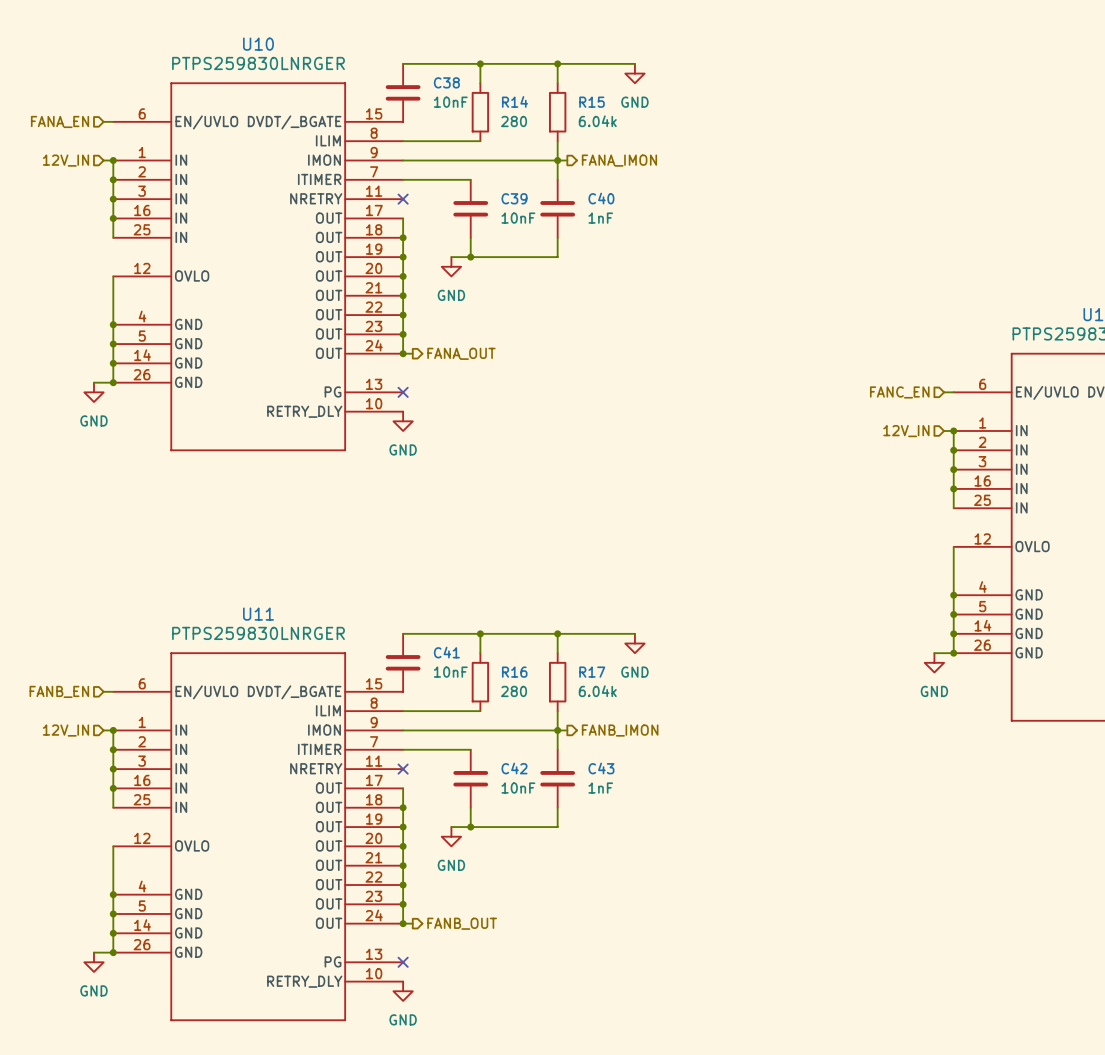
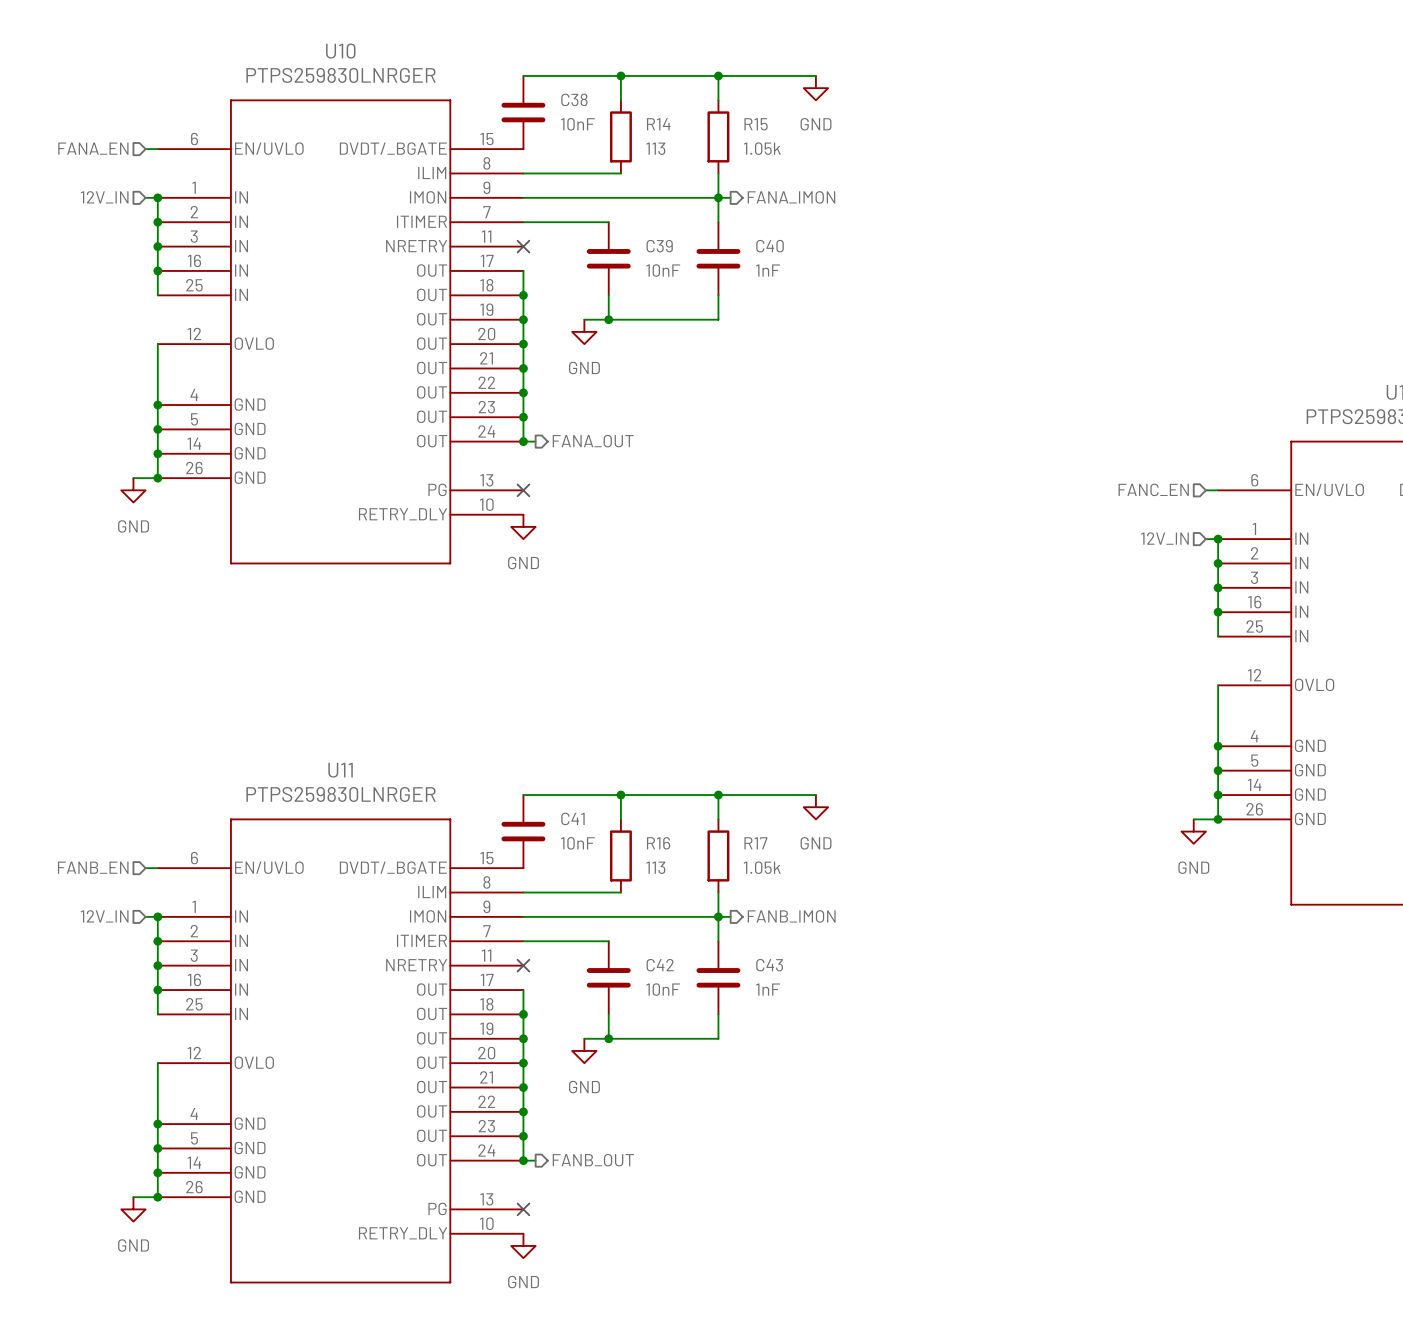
R14 value: 280 (514, 121) -> 113 (655, 148)
R15 value: 6.04k (597, 121) -> 1.05k (762, 148)
R16 value: 280 (514, 691) -> 113 (655, 867)
R17 value: 6.04k (597, 691) -> 1.05k (762, 867)

